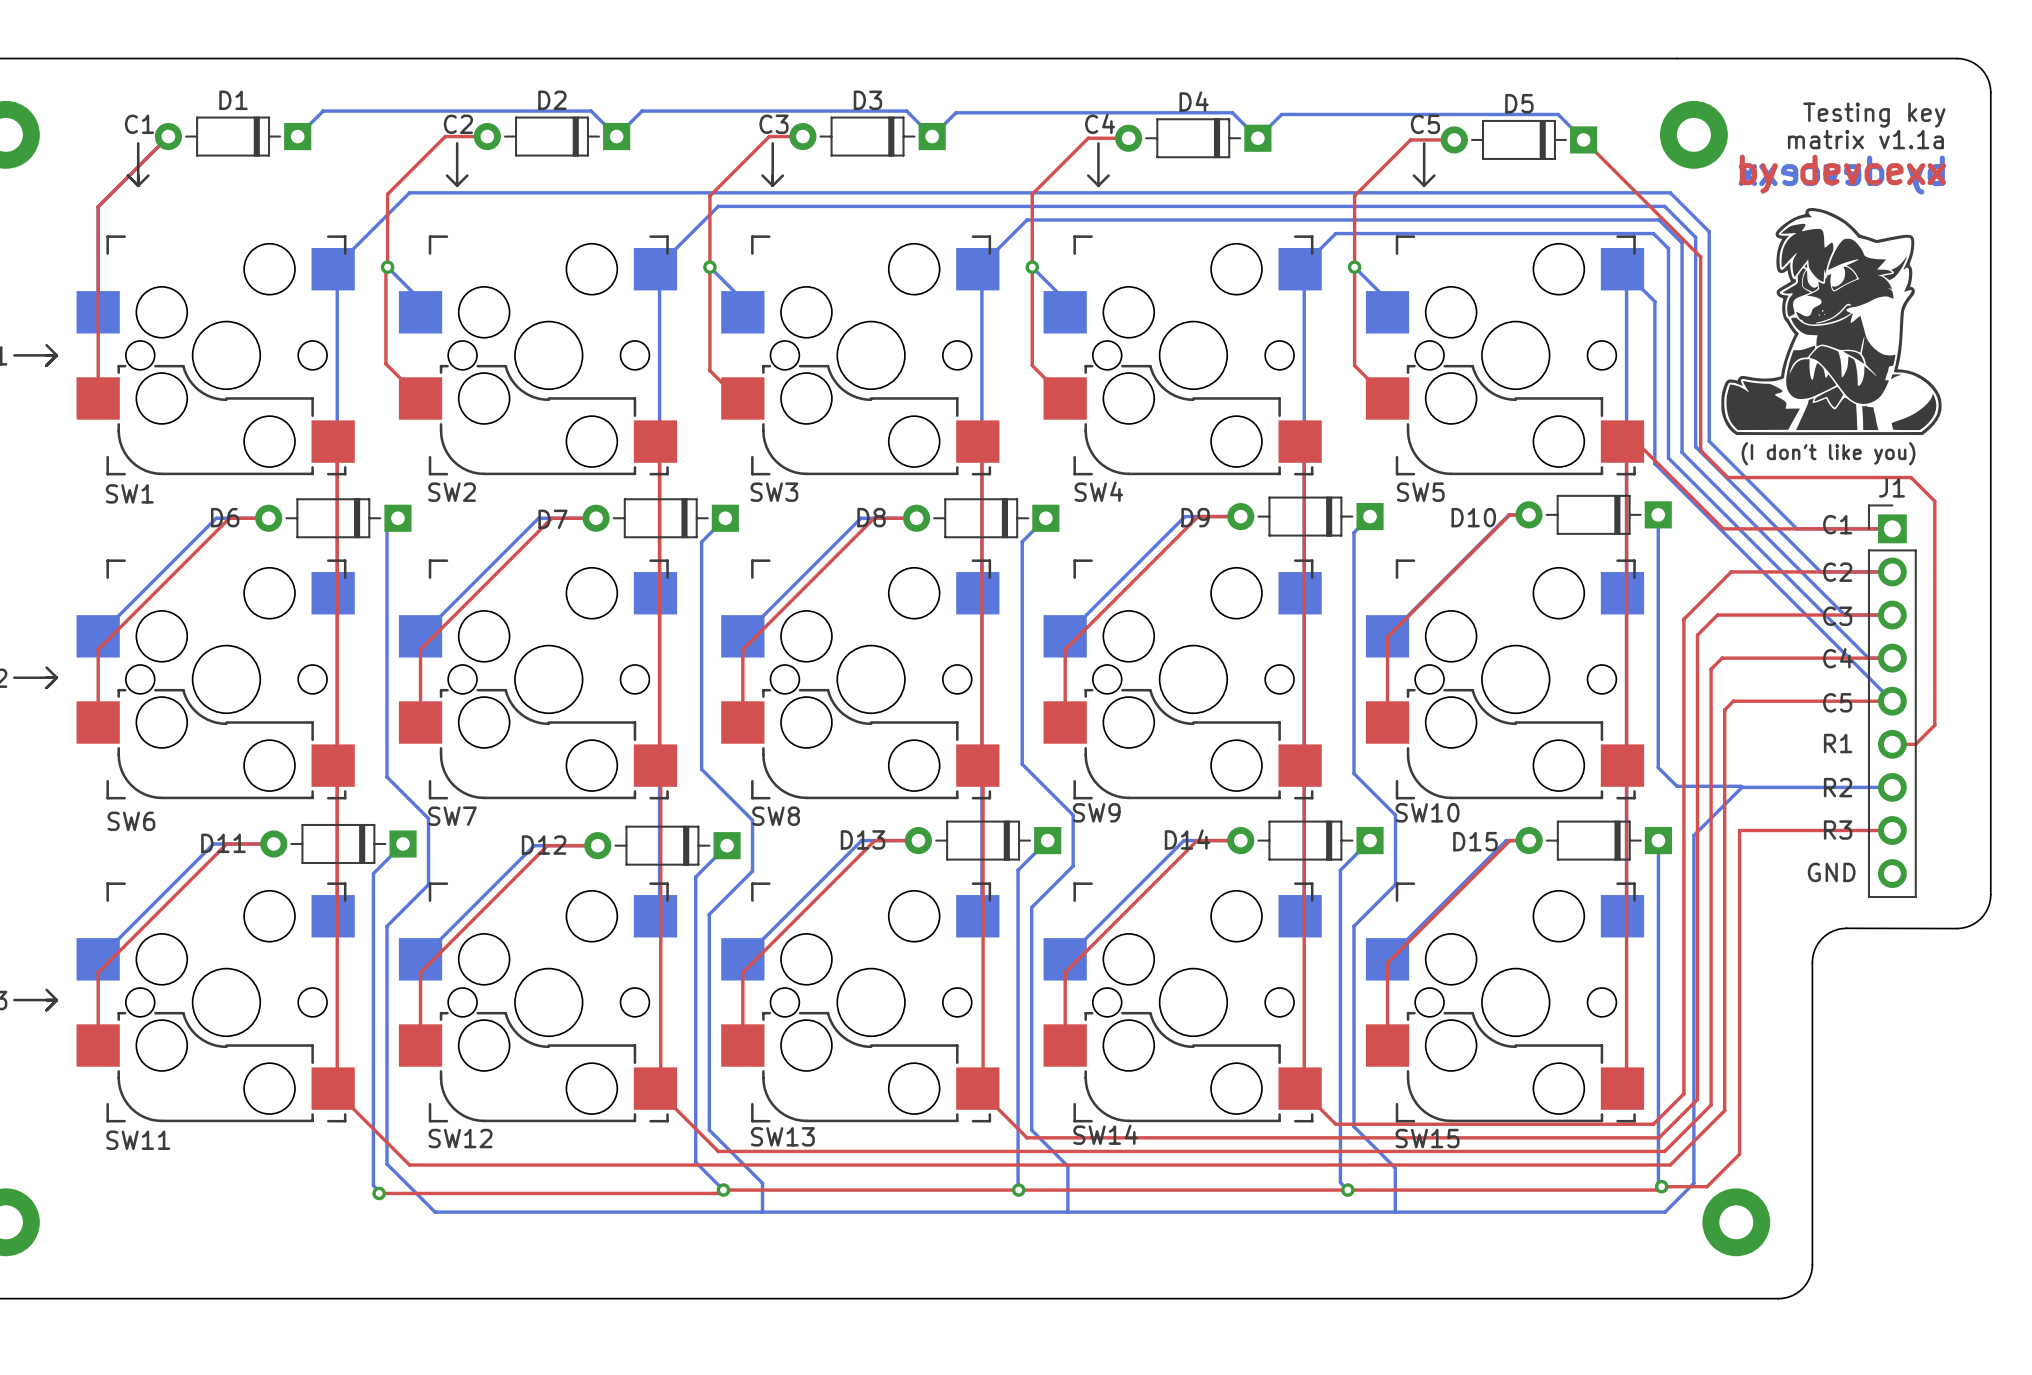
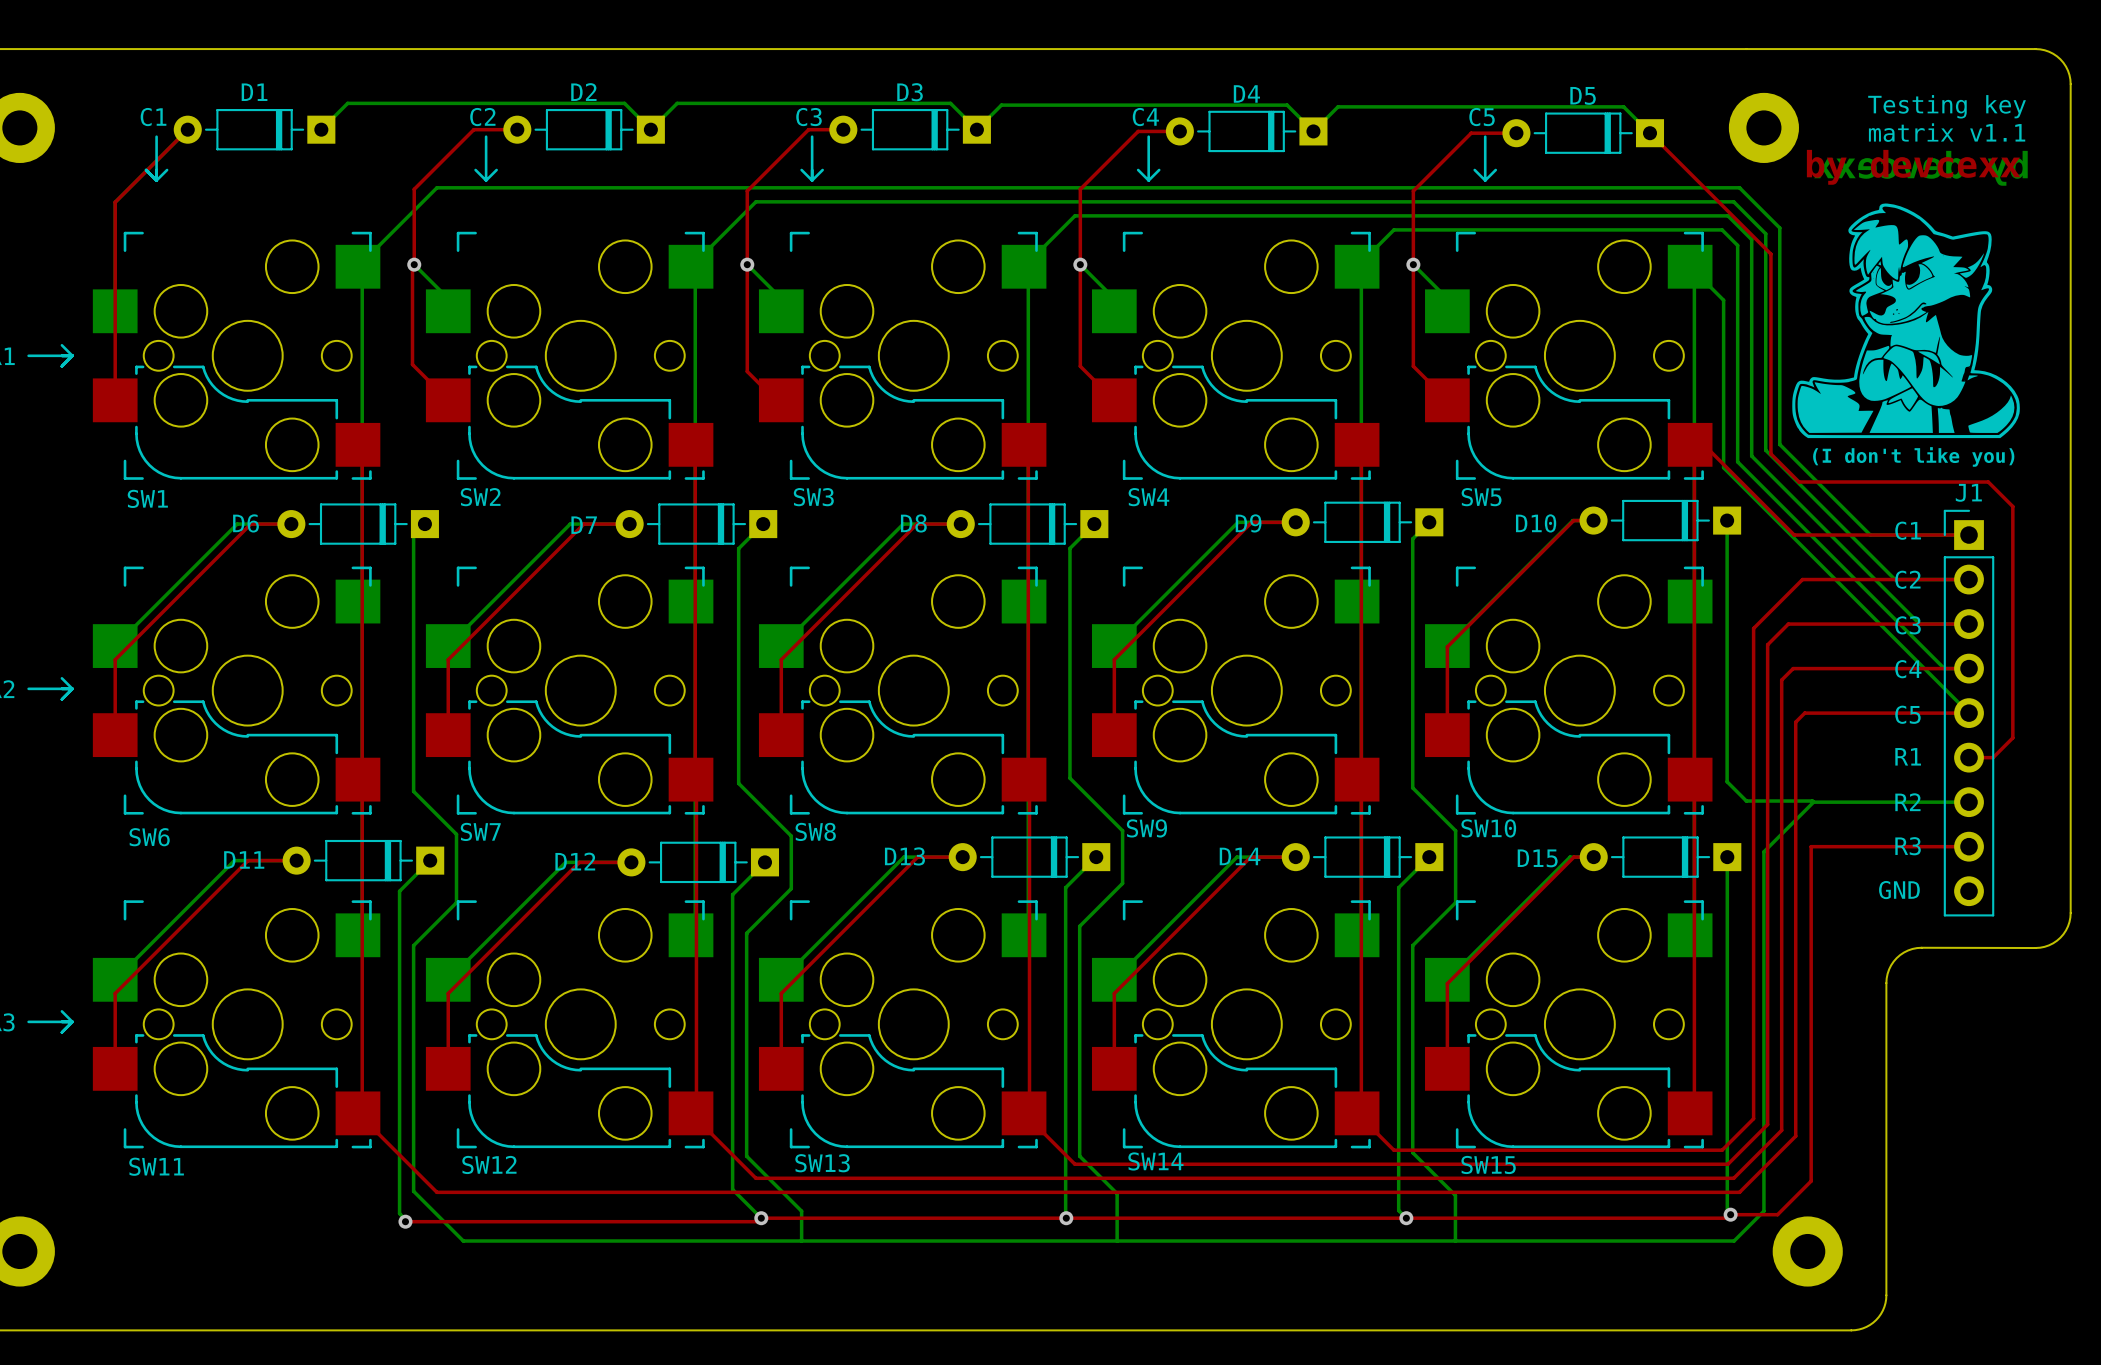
text: matrix v1.1a (1865, 139) -> matrix v1.1 (1947, 132)

